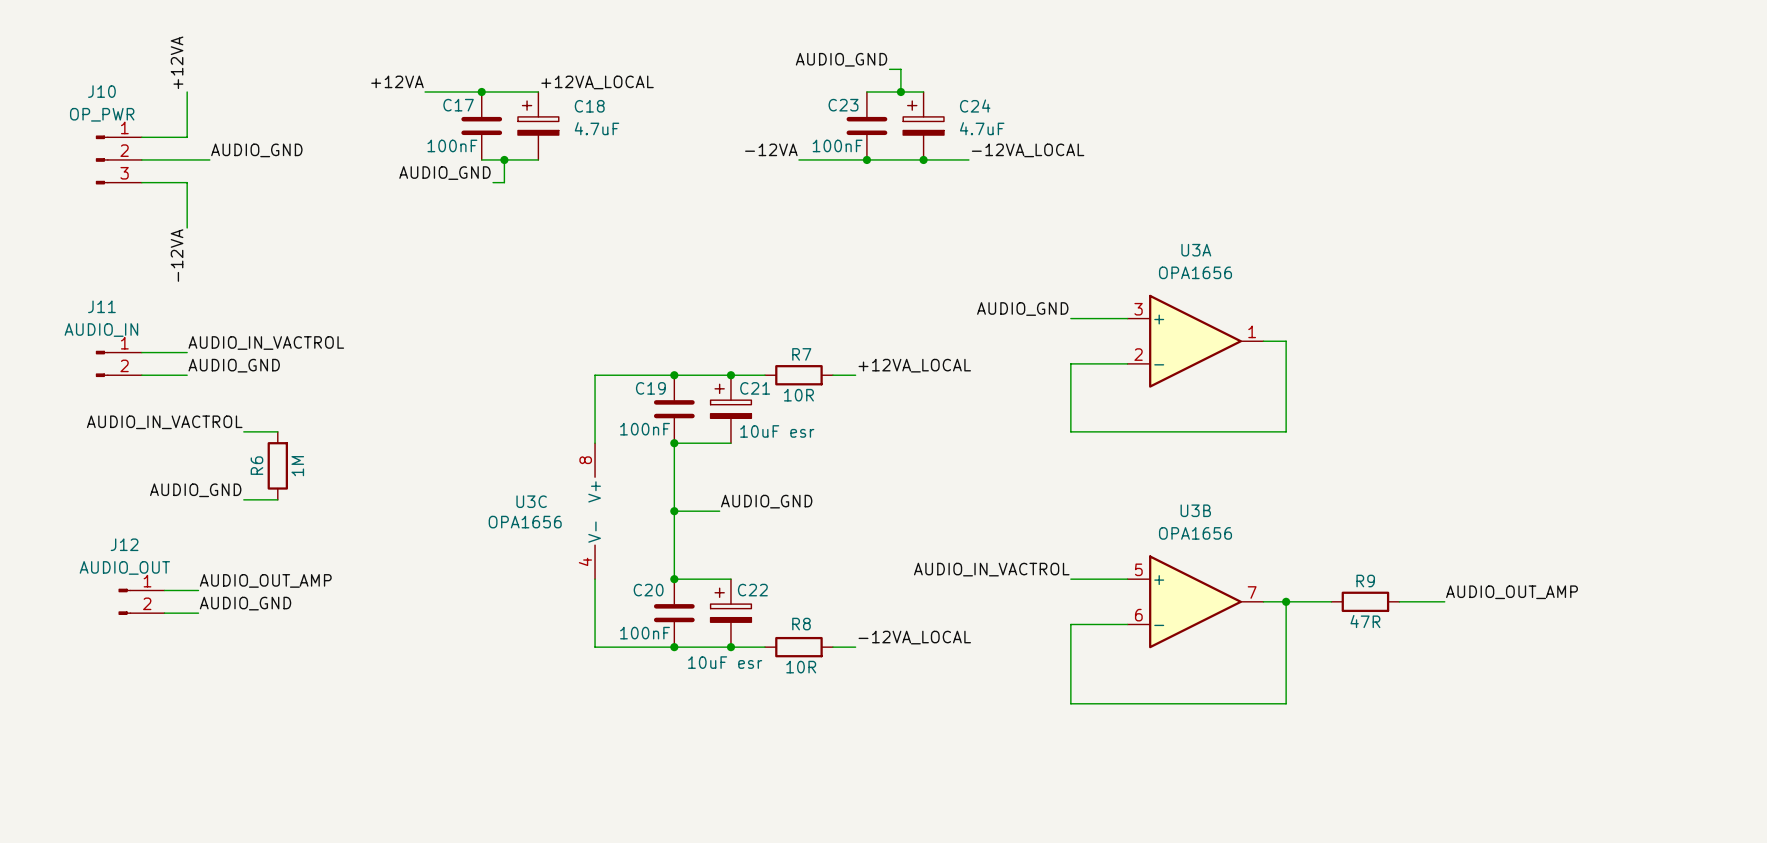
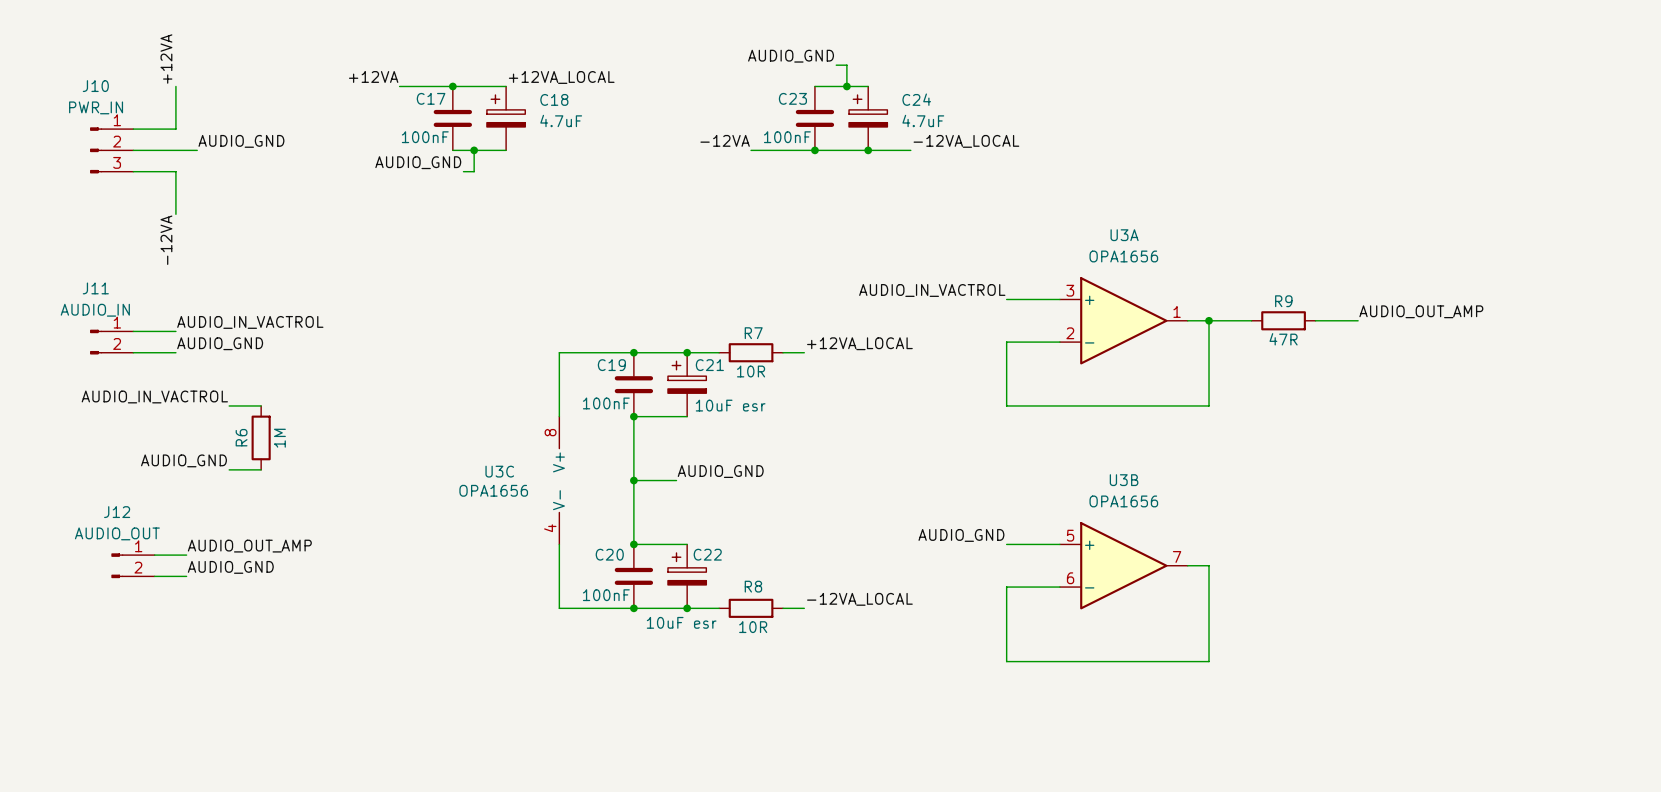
J10 value: OP_PWR (102, 114) -> PWR_IN (96, 107)
label: AUDIO_GND (1022, 309) -> AUDIO_IN_VACTROL (932, 290)
label: none -> AUDIO_OUT_AMP (1421, 311)
wire: none -> (1209, 320) (1251, 320)
junction: none -> (1209, 320)
wire: none -> (1315, 320) (1358, 320)
label: AUDIO_IN_VACTROL (991, 569) -> AUDIO_GND (961, 535)
label: AUDIO_OUT_AMP (1511, 592) -> none
wire: (1286, 601) (1331, 601) -> none
junction: (1286, 601) -> none
R9 position: (1365, 601) -> (1283, 320)
wire: (1399, 601) (1444, 601) -> none

